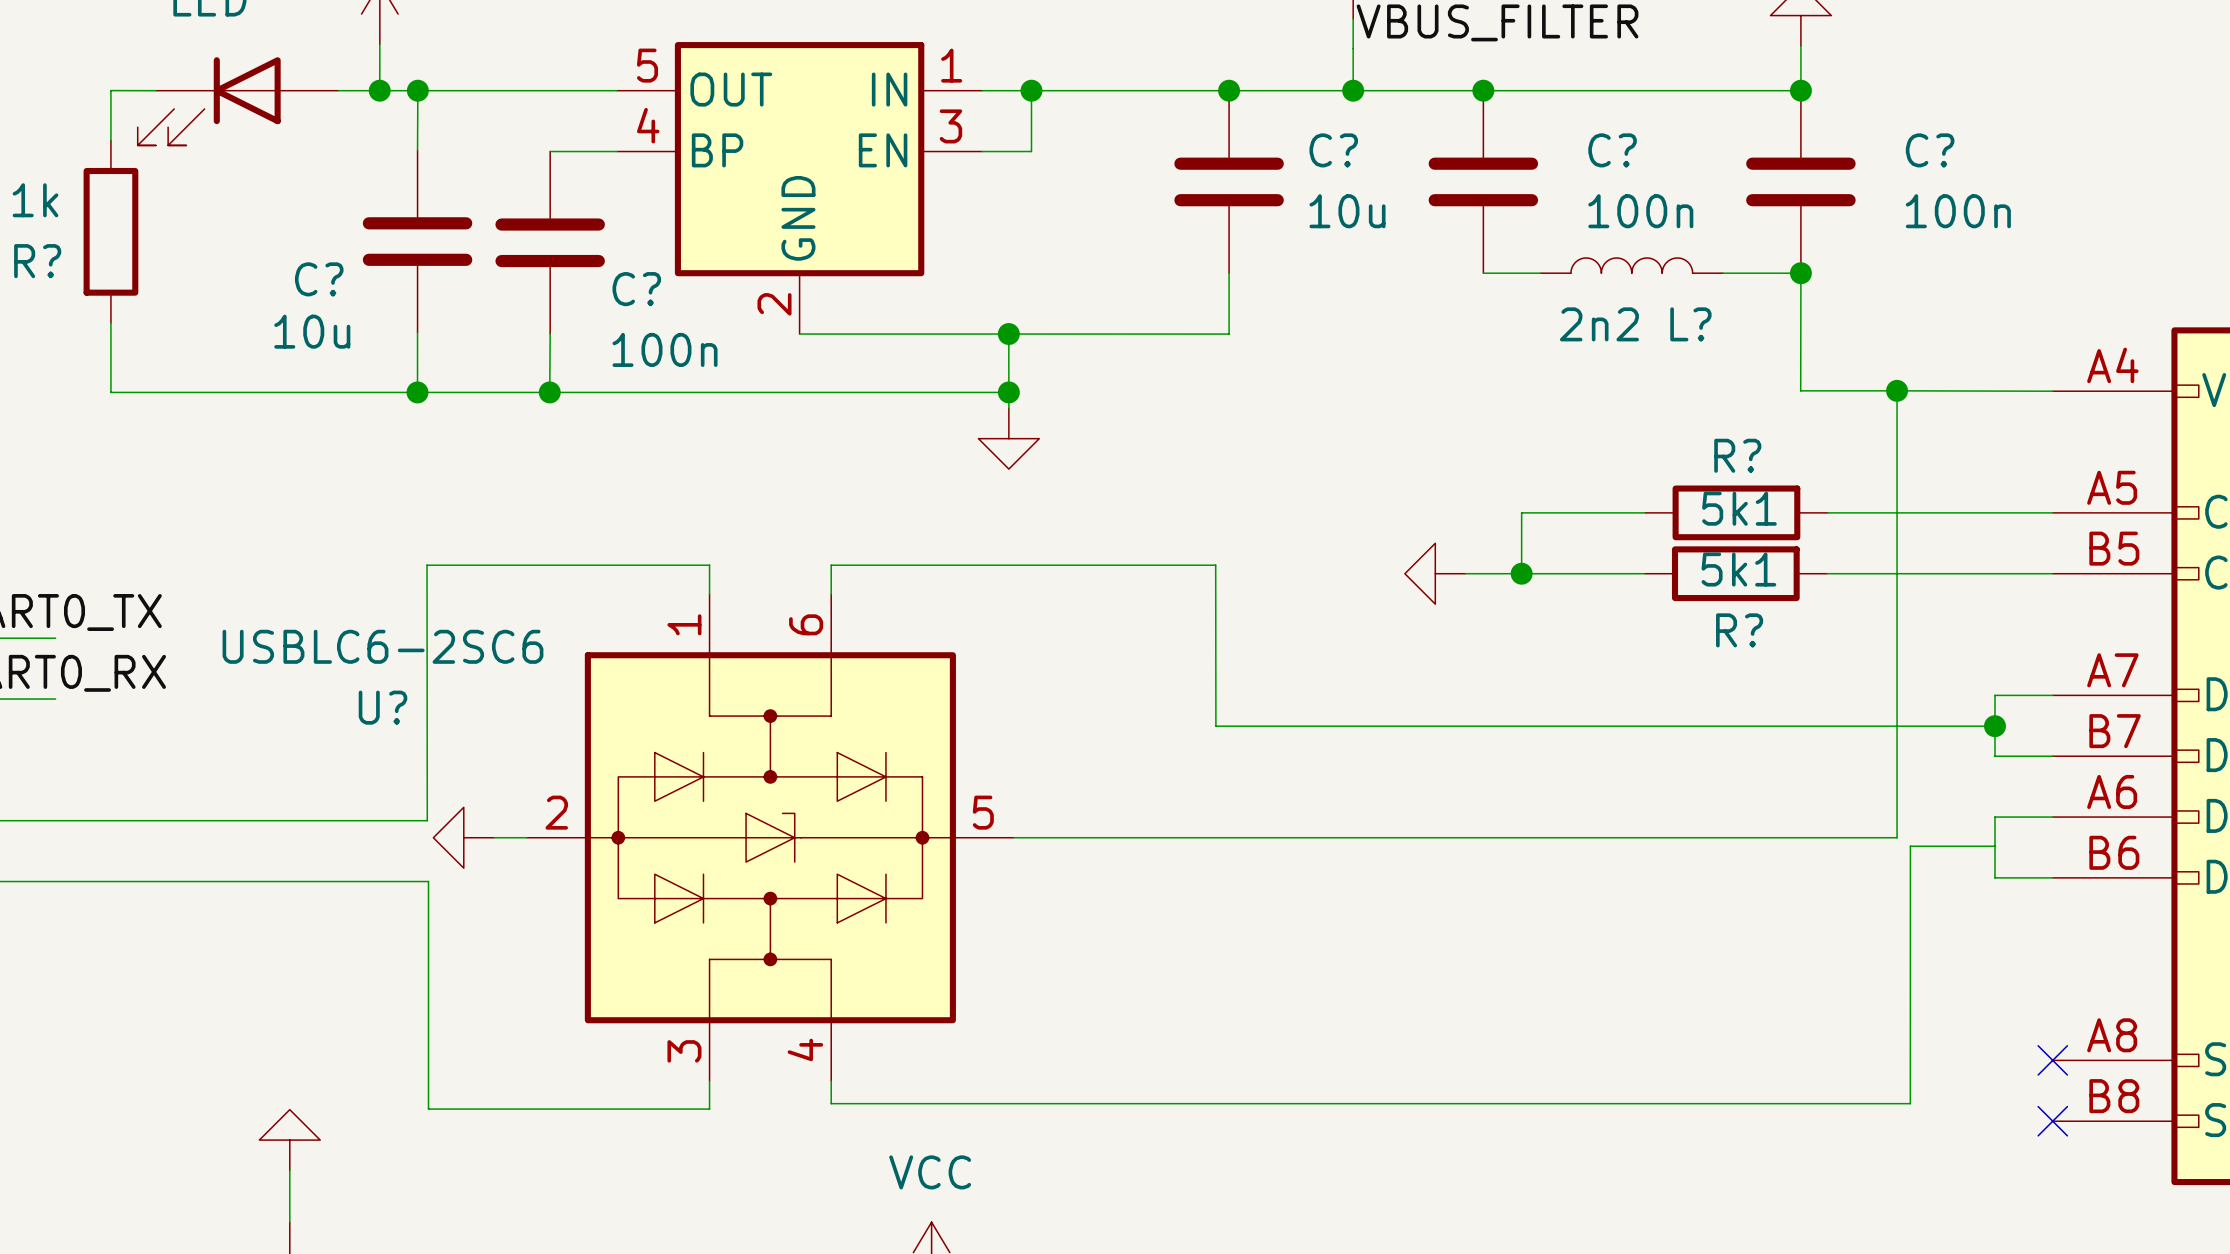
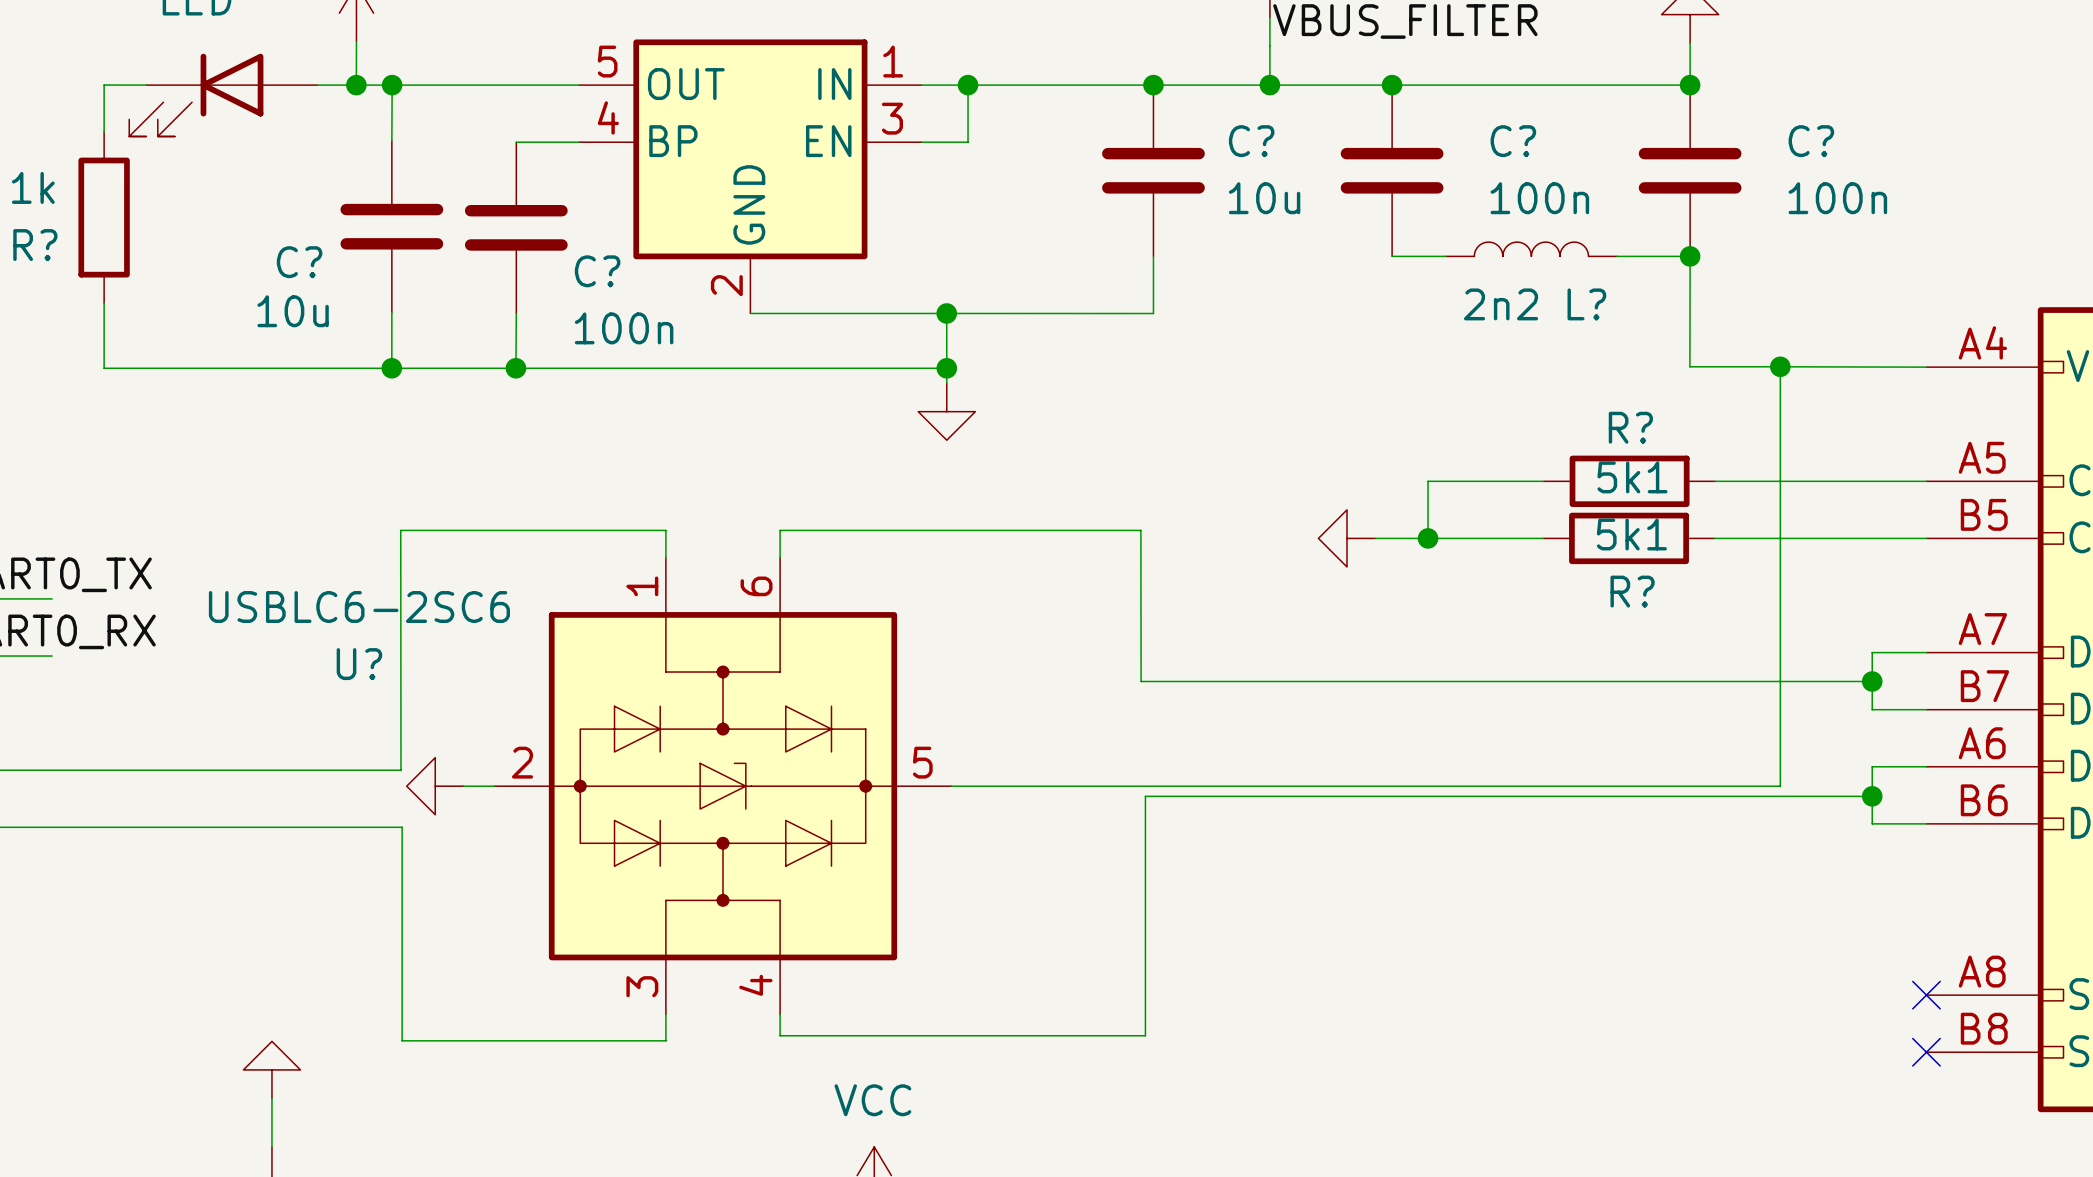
wire: (1995, 846) (1910, 846) (1910, 1103) (1220, 1103) -> (1872, 796) (1145, 796) (1145, 1035)
junction: none -> (1872, 796)

